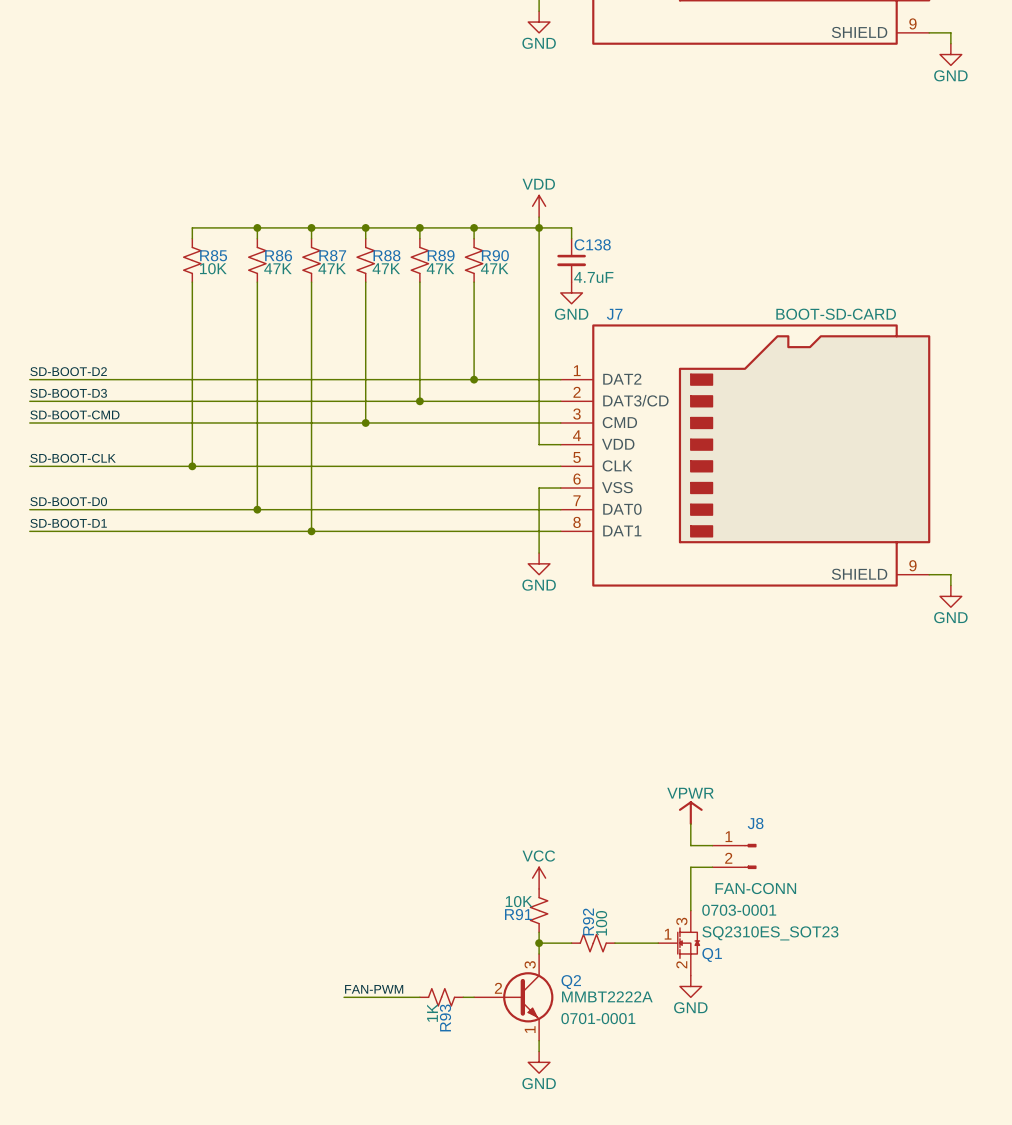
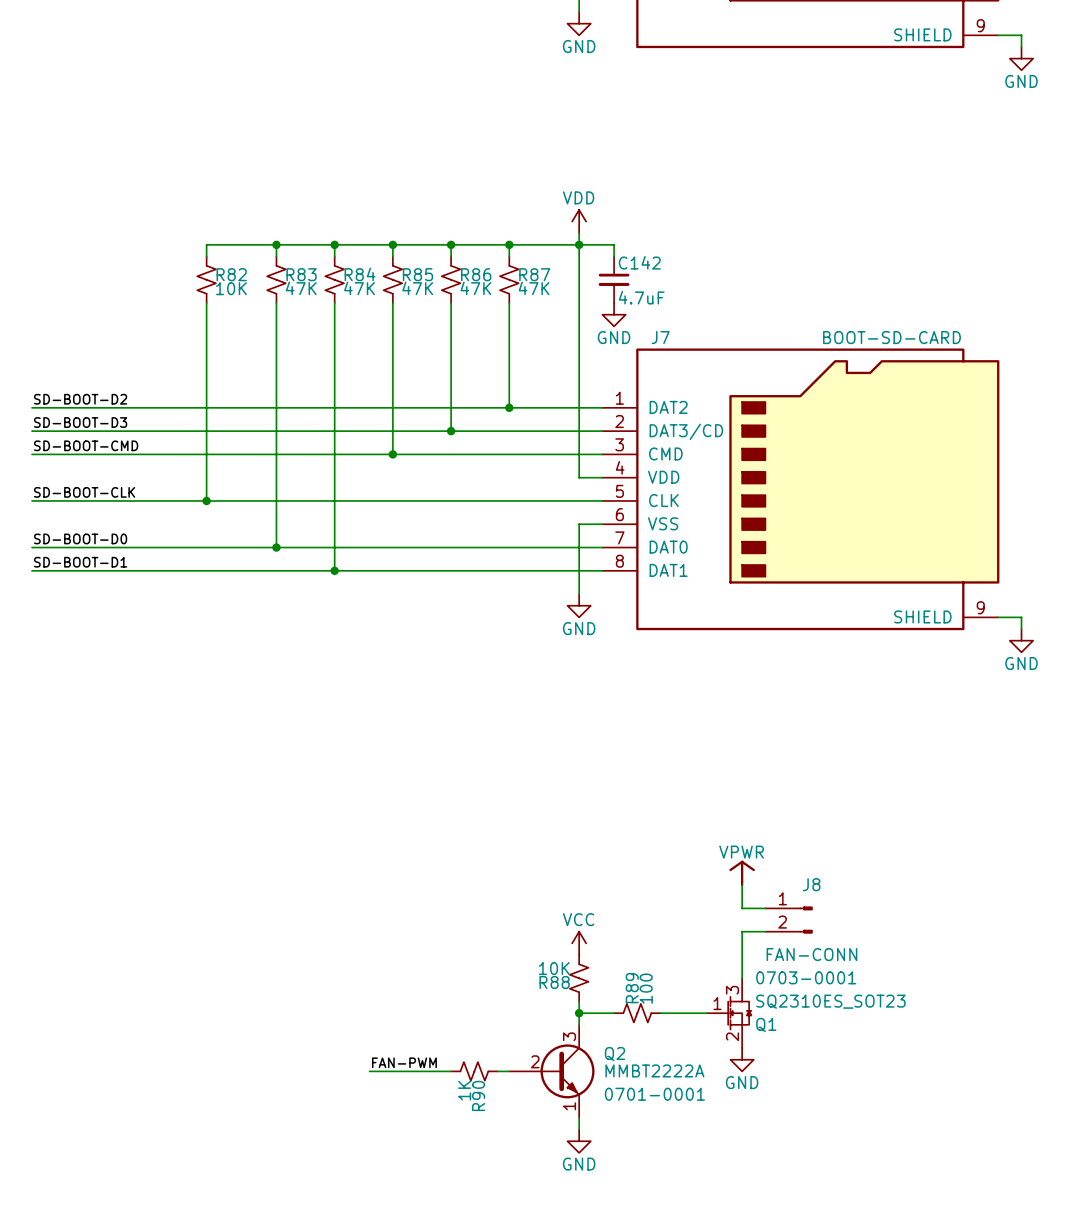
C138 name: C138 (592, 244) -> C142 (639, 262)
R85 name: R85 (213, 255) -> R82 (231, 274)
R86 name: R86 (278, 255) -> R83 (301, 274)
R87 name: R87 (332, 255) -> R84 (360, 274)
R88 name: R88 (386, 255) -> R85 (417, 274)
R89 name: R89 (441, 255) -> R86 (476, 274)
R90 name: R90 (495, 255) -> R87 (534, 274)
R91 name: R91 (518, 914) -> R88 (554, 982)
R92 name: R92 (588, 921) -> R89 (632, 988)
R93 name: R93 (445, 1017) -> R90 (478, 1095)

